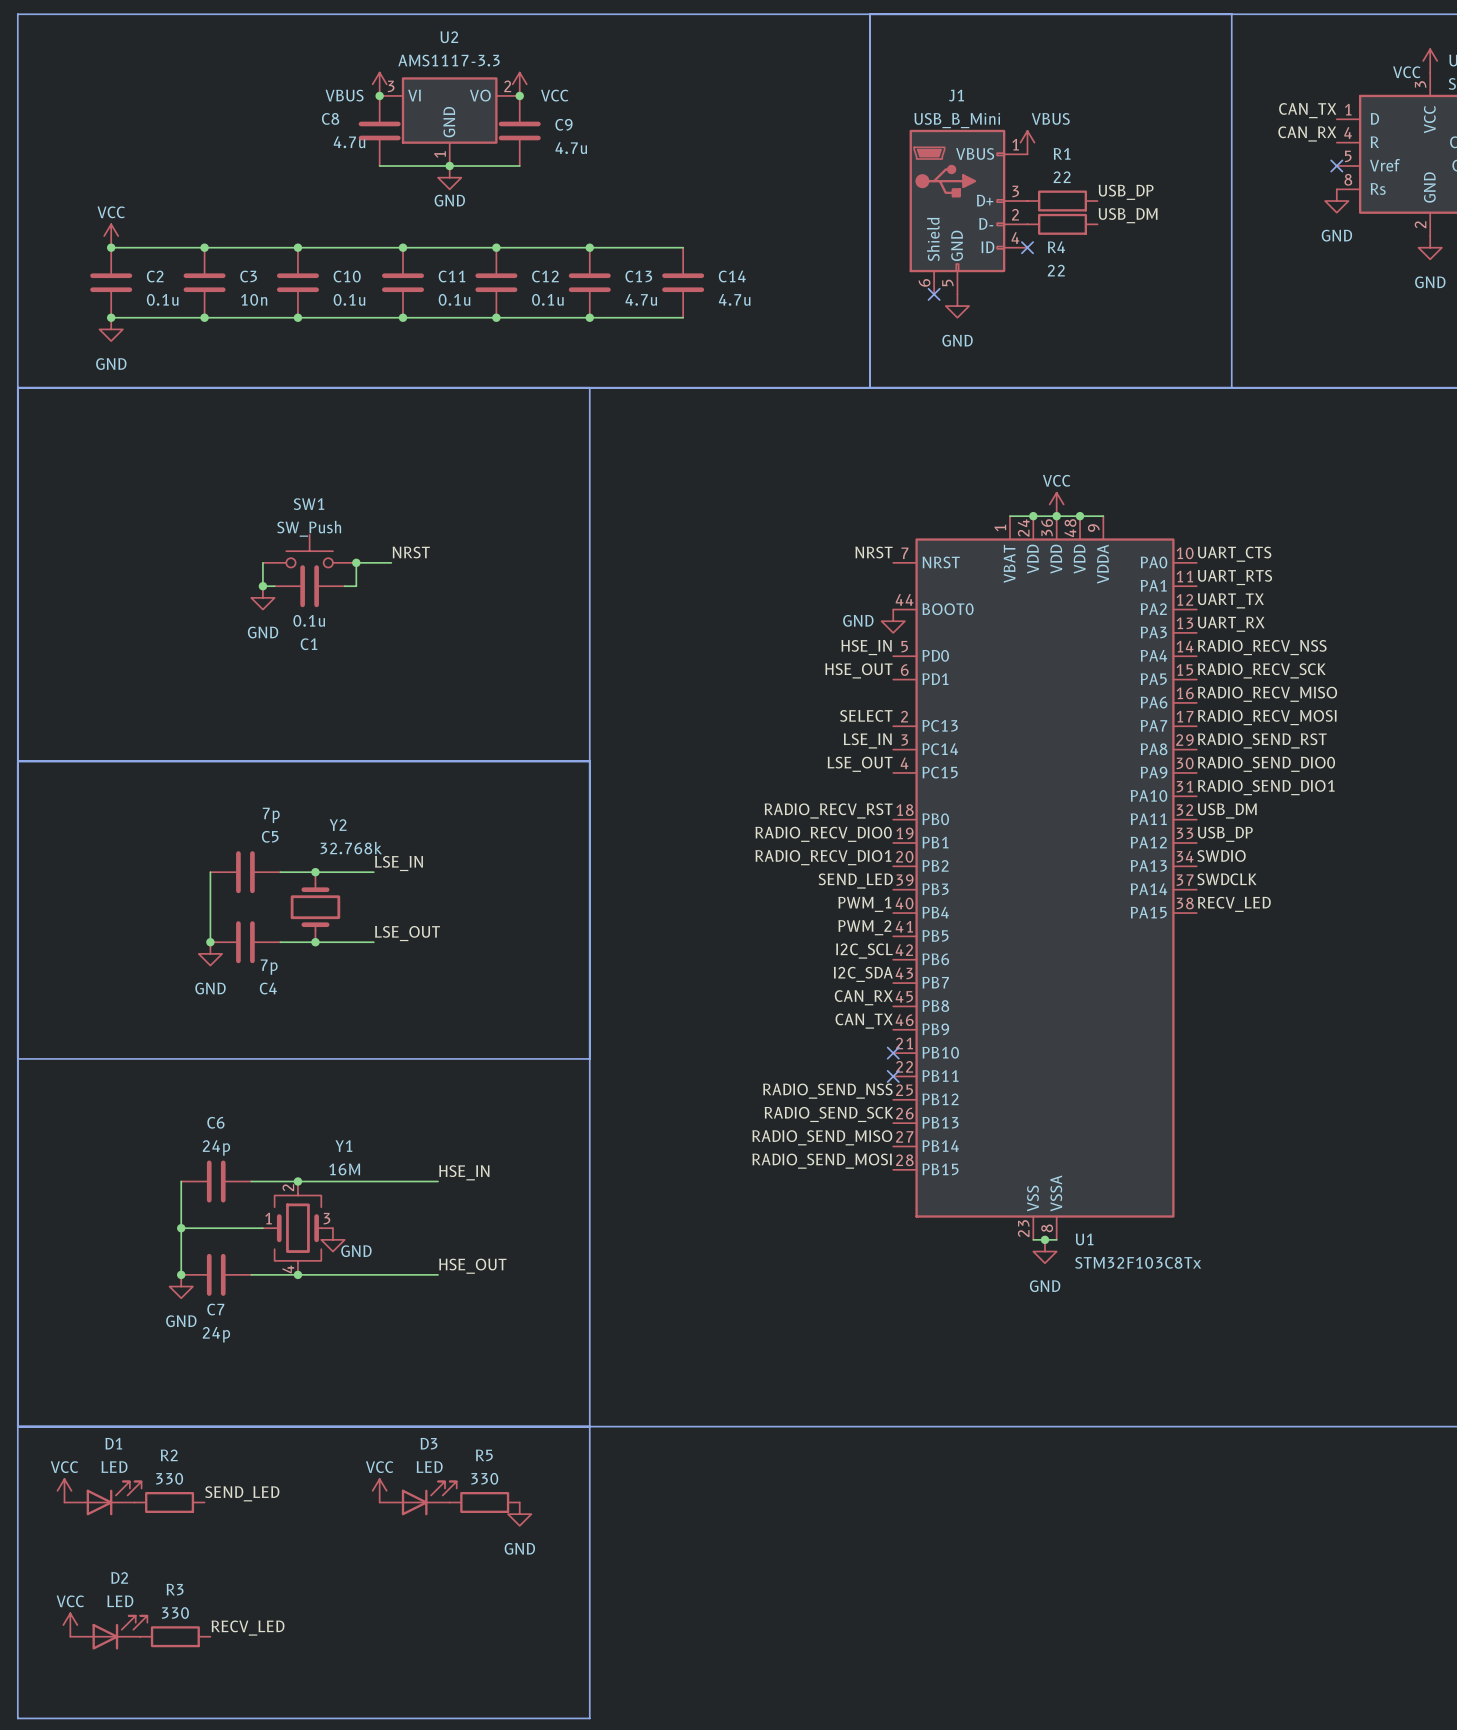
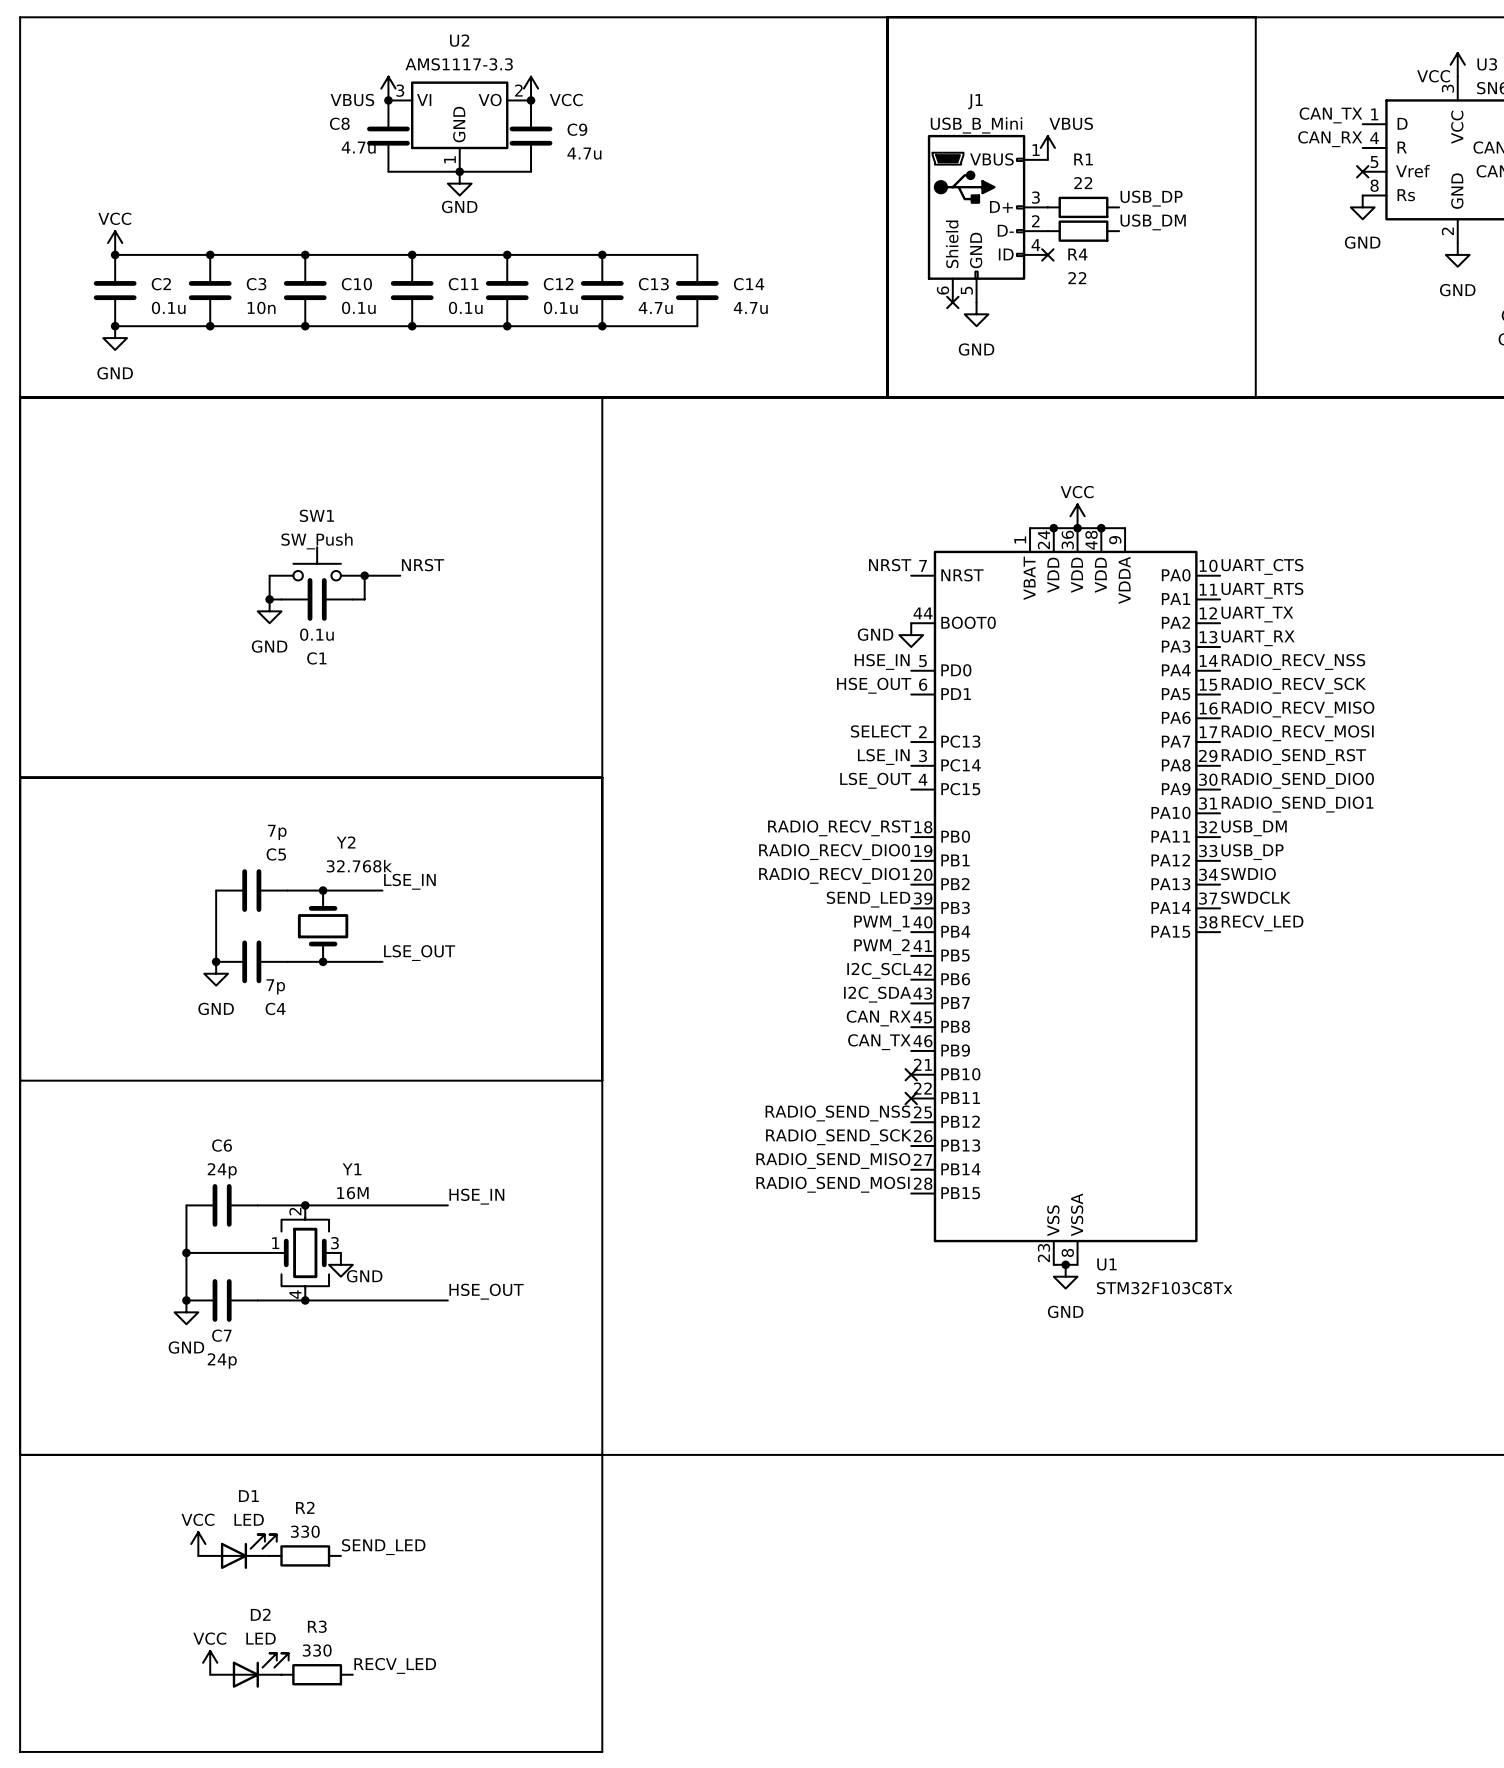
power symbol: VCC (64, 1490) -> none
power symbol: VCC (379, 1490) -> none
label position: SEND_LED (242, 1493) -> SEND_LED (383, 1547)
D1 position: (103, 1498) -> (237, 1551)
D3: LED (418, 1498) -> none
R2 position: (169, 1502) -> (305, 1555)
R5: 330 (484, 1502) -> none
power symbol: none -> VCC (198, 1544)
power symbol: GND (519, 1514) -> none
power symbol: VCC (70, 1625) -> none
label position: RECV_LED (248, 1628) -> RECV_LED (395, 1665)
power symbol: none -> VCC (210, 1662)
D2 position: (108, 1632) -> (249, 1670)
R3 position: (175, 1636) -> (317, 1674)

